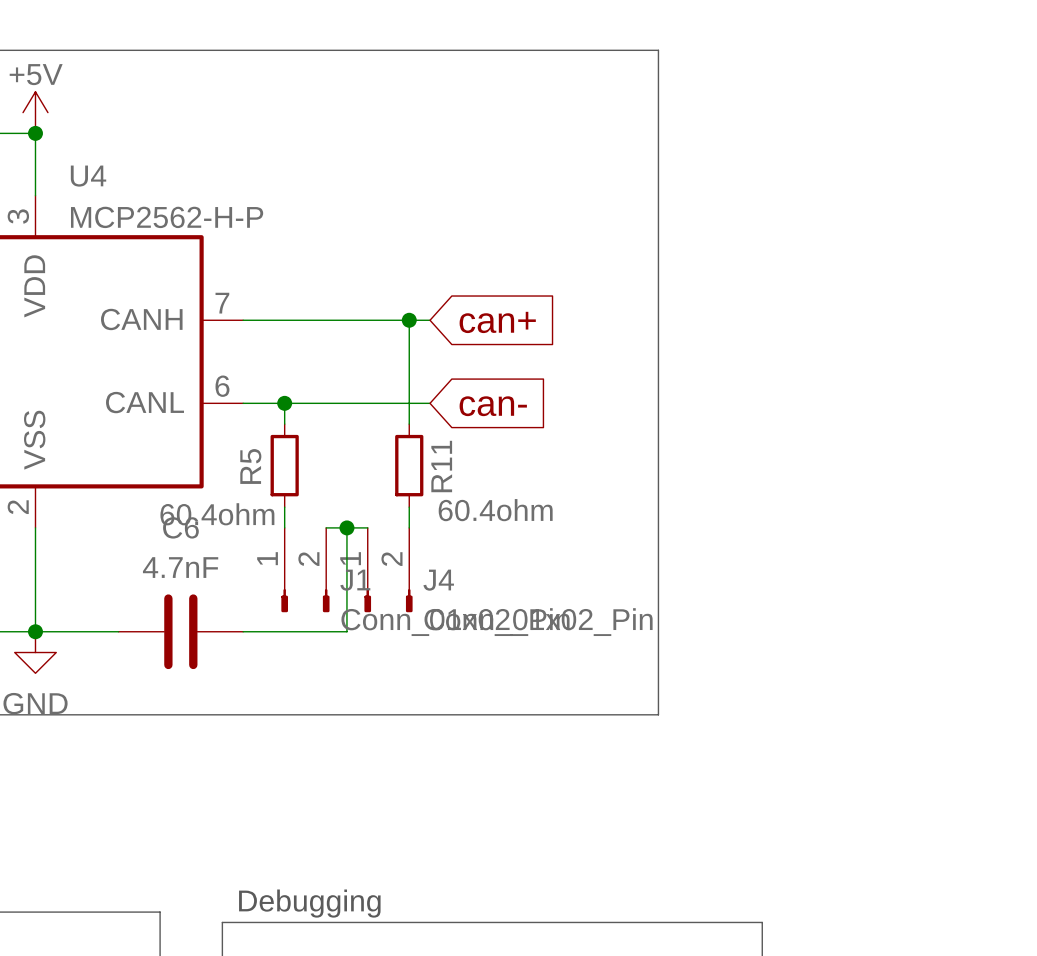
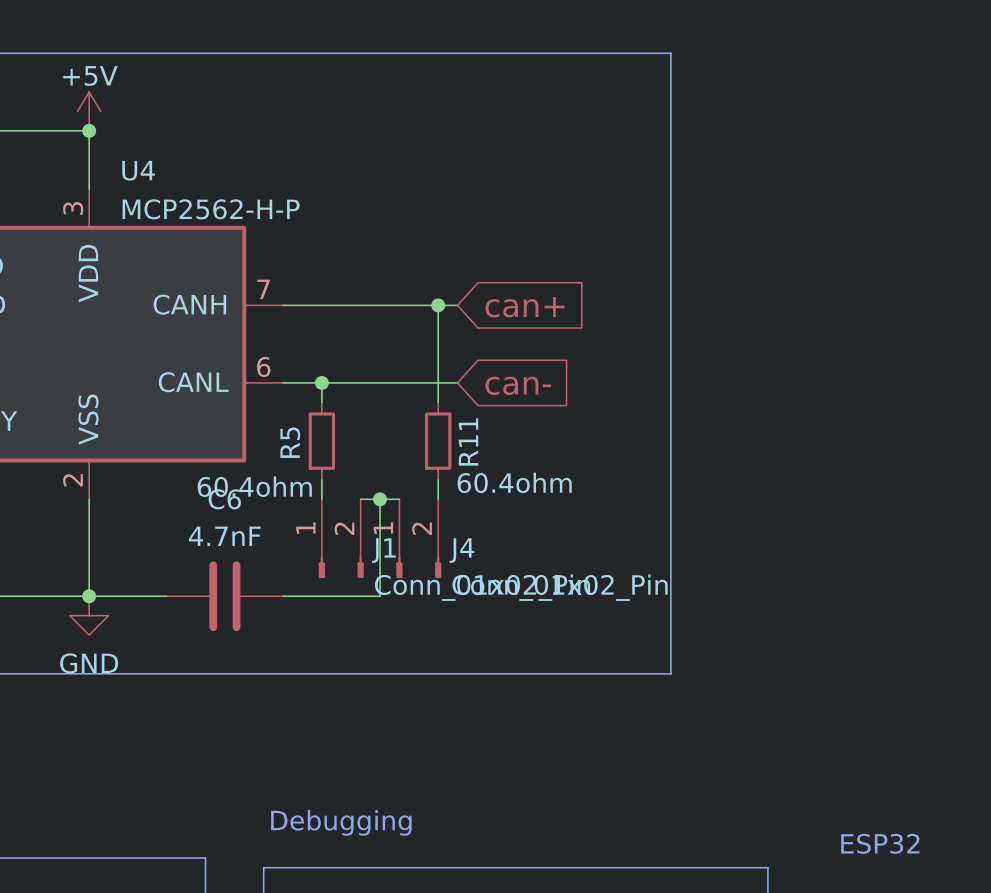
text: none -> ESP32 (880, 843)
text position: Debugging (309, 903) -> Debugging (341, 822)

